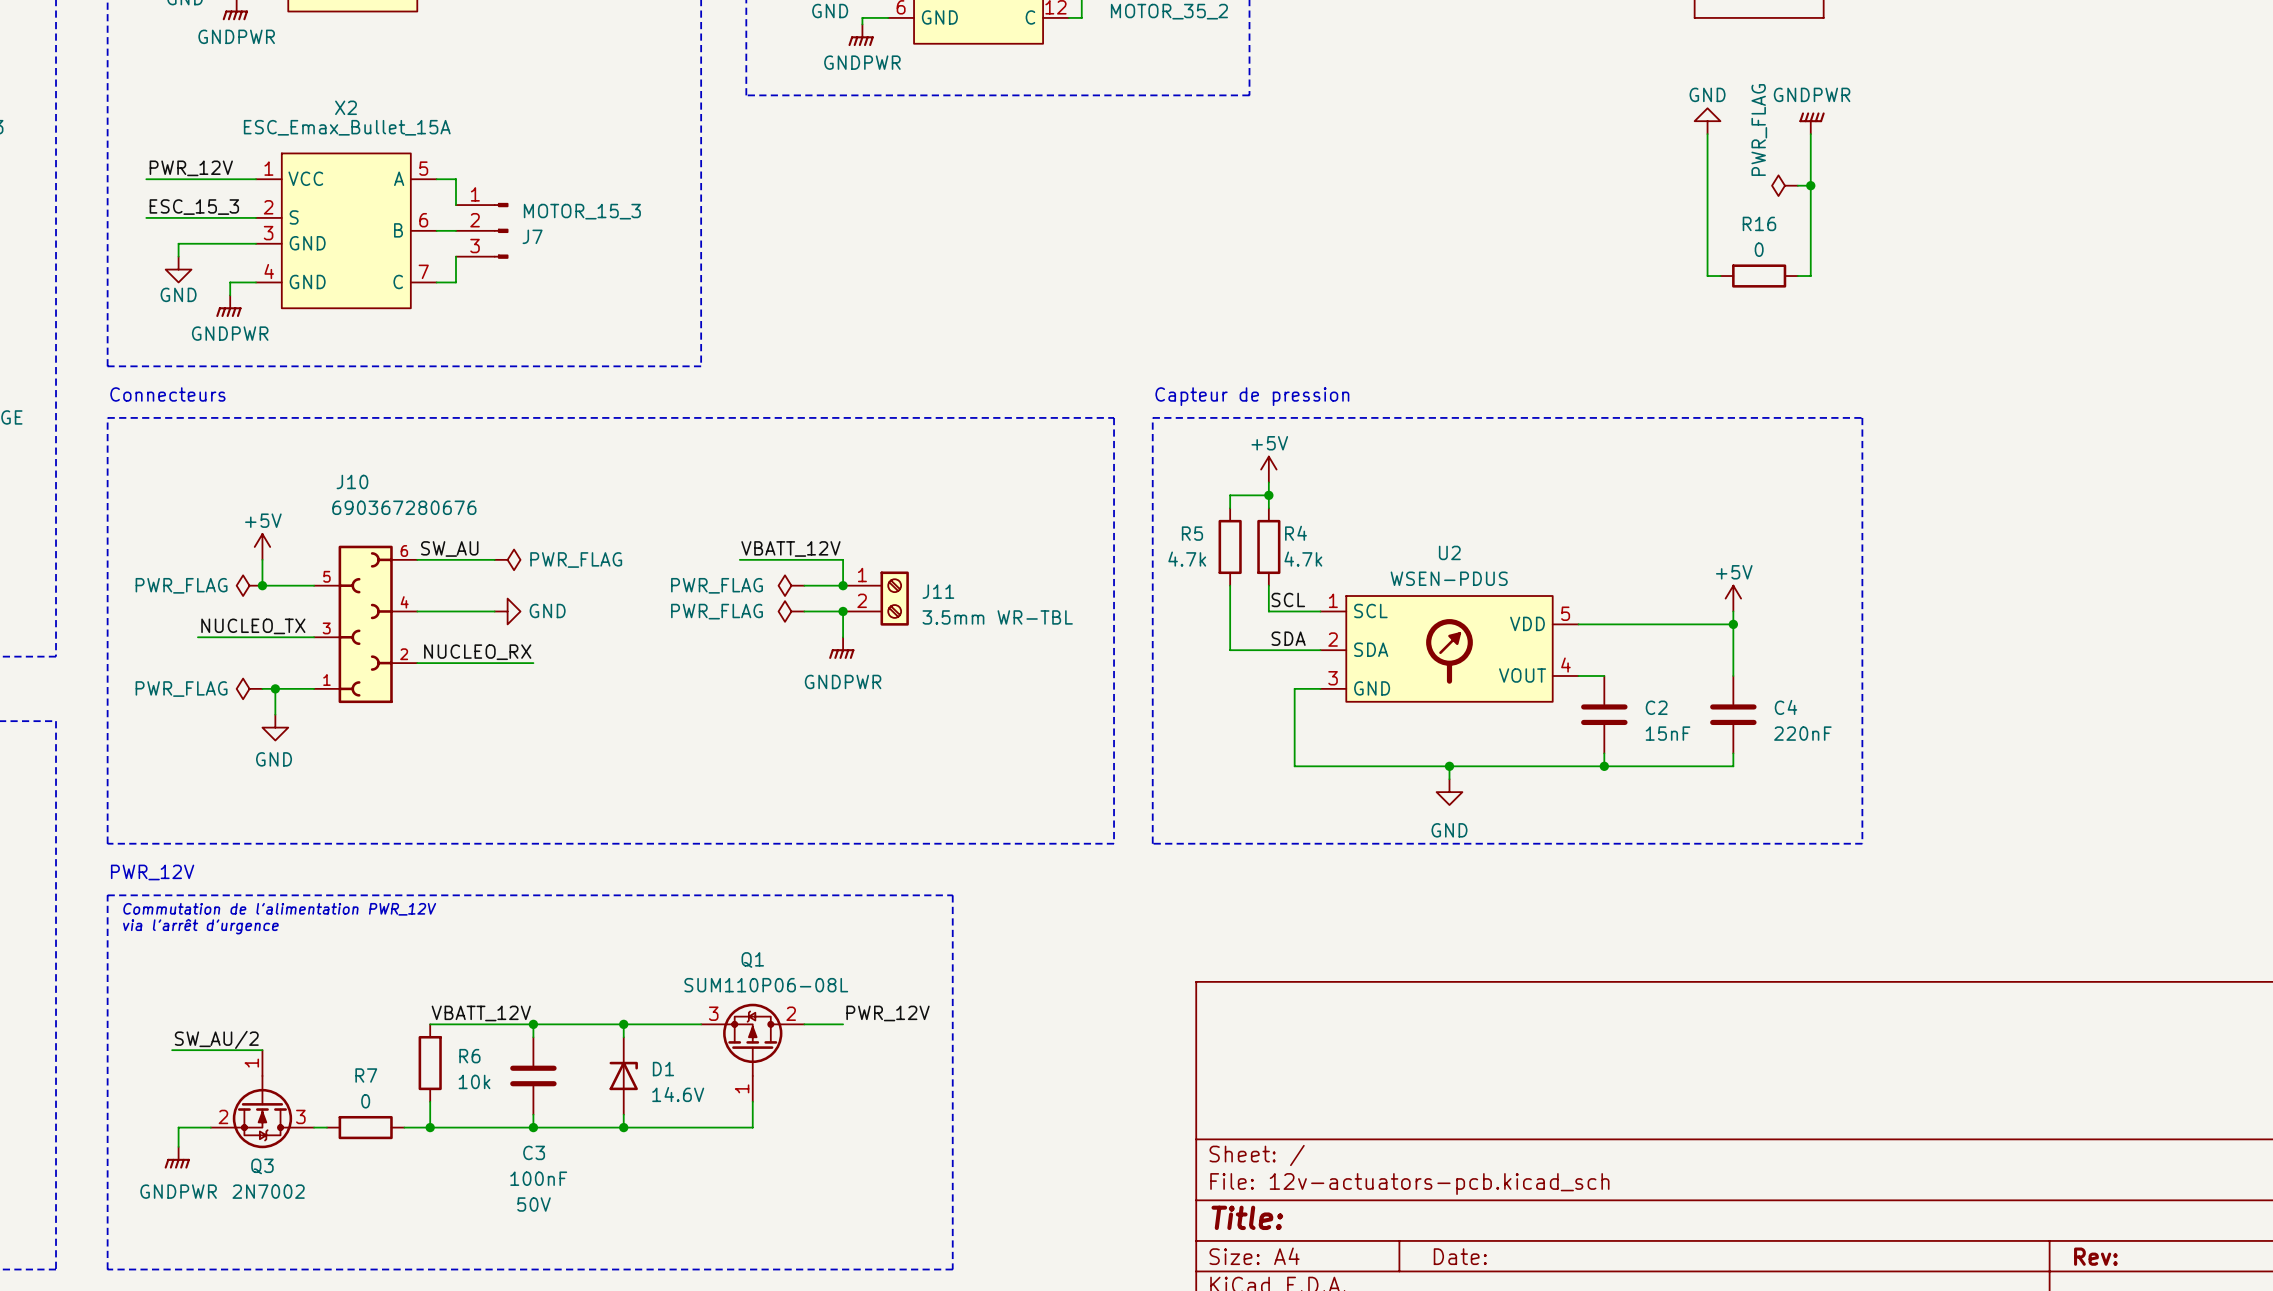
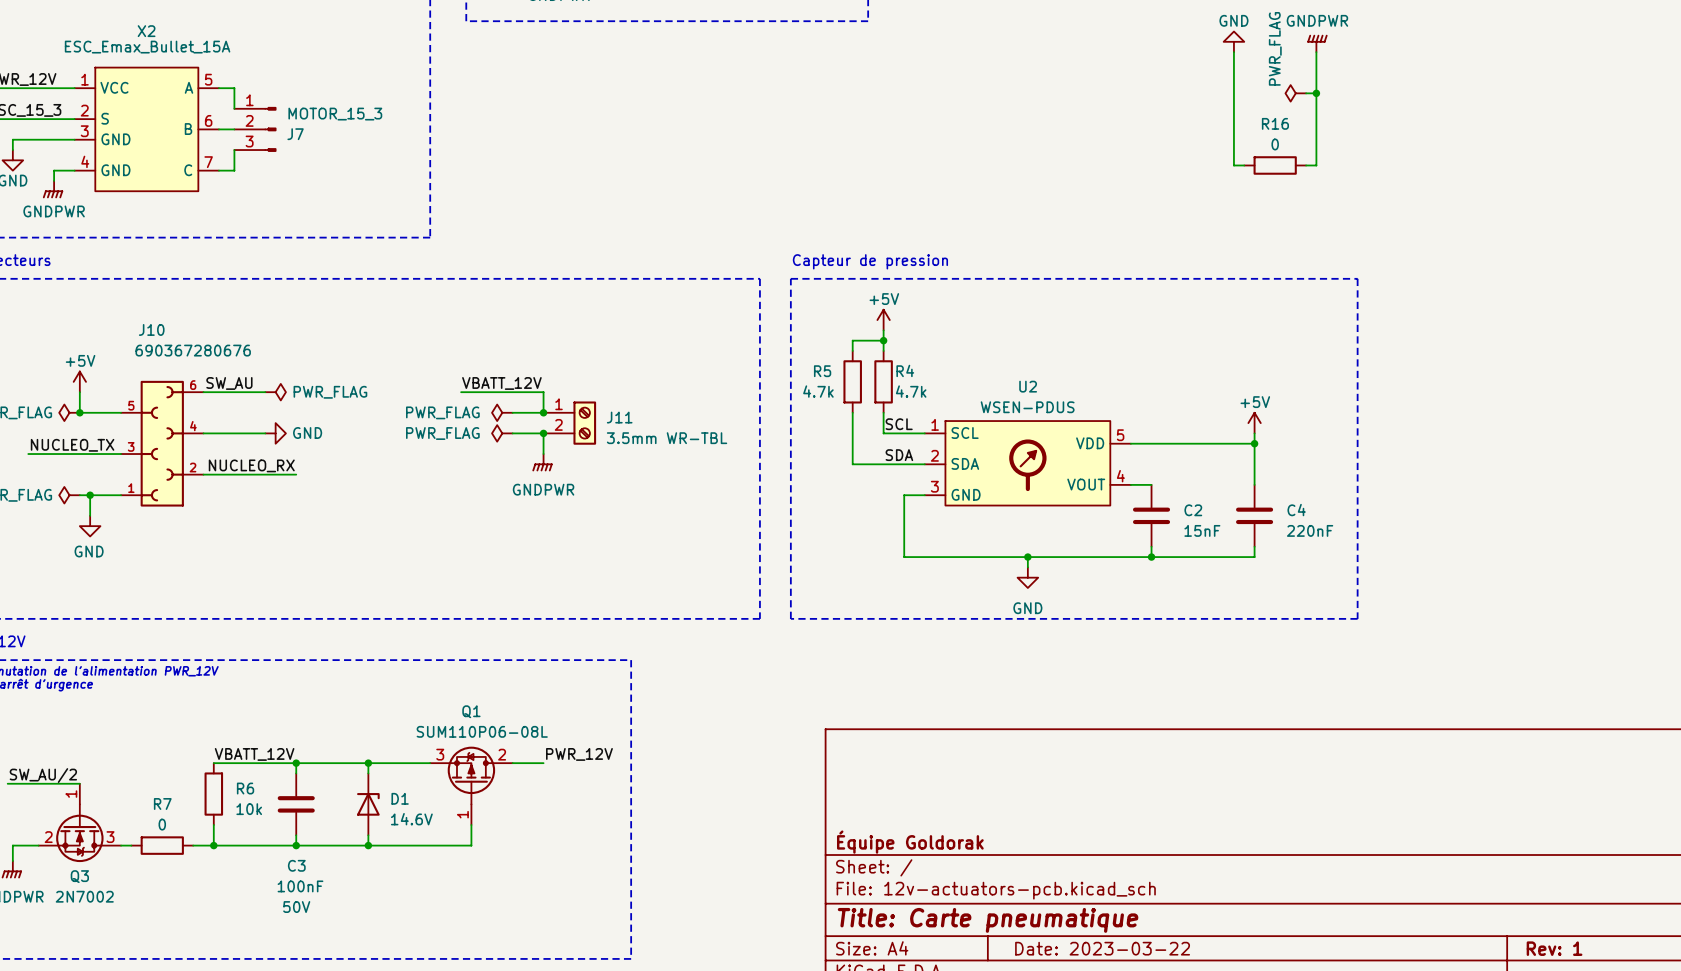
title block: none -> Équipe Goldorak (910, 842)
title block: Title: (1247, 1217) -> Title: Carte pneumatique (988, 920)
title block: Date: (1460, 1256) -> Date: 2023-03-22 (1102, 948)
title block: Rev: (2095, 1256) -> Rev: 1 (1554, 948)

